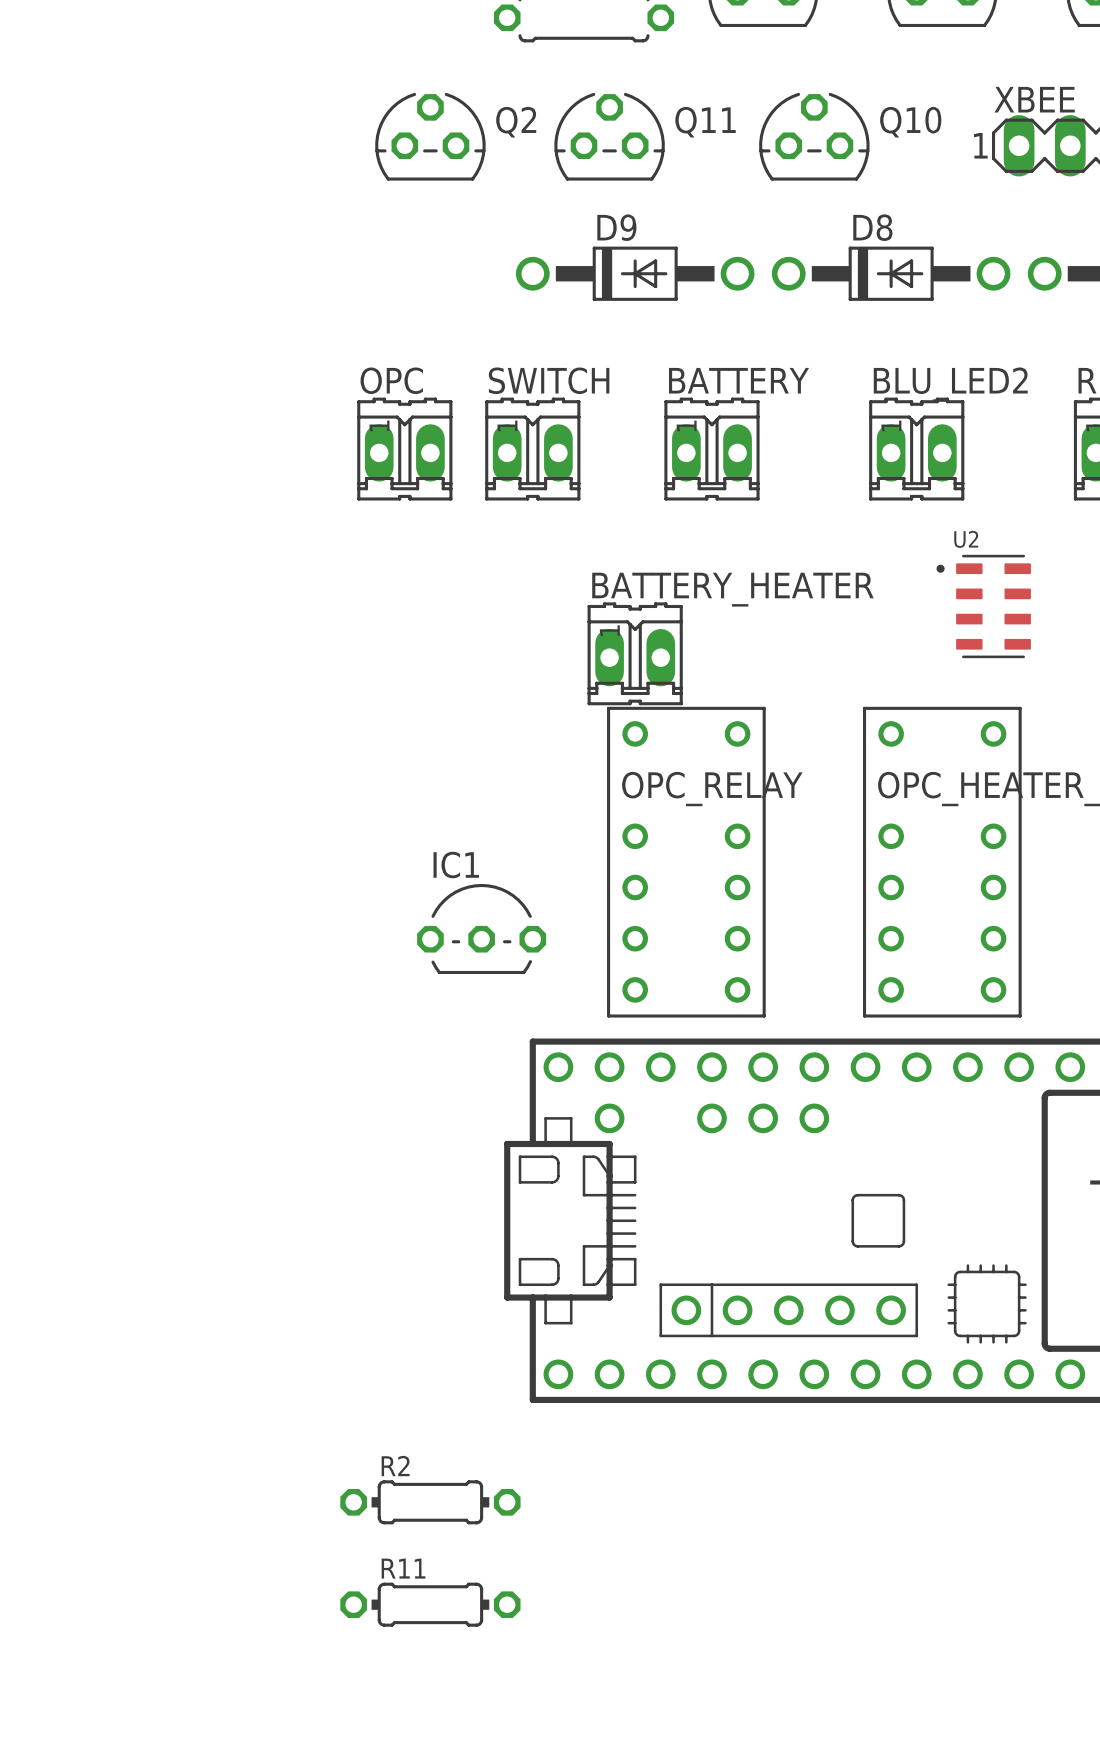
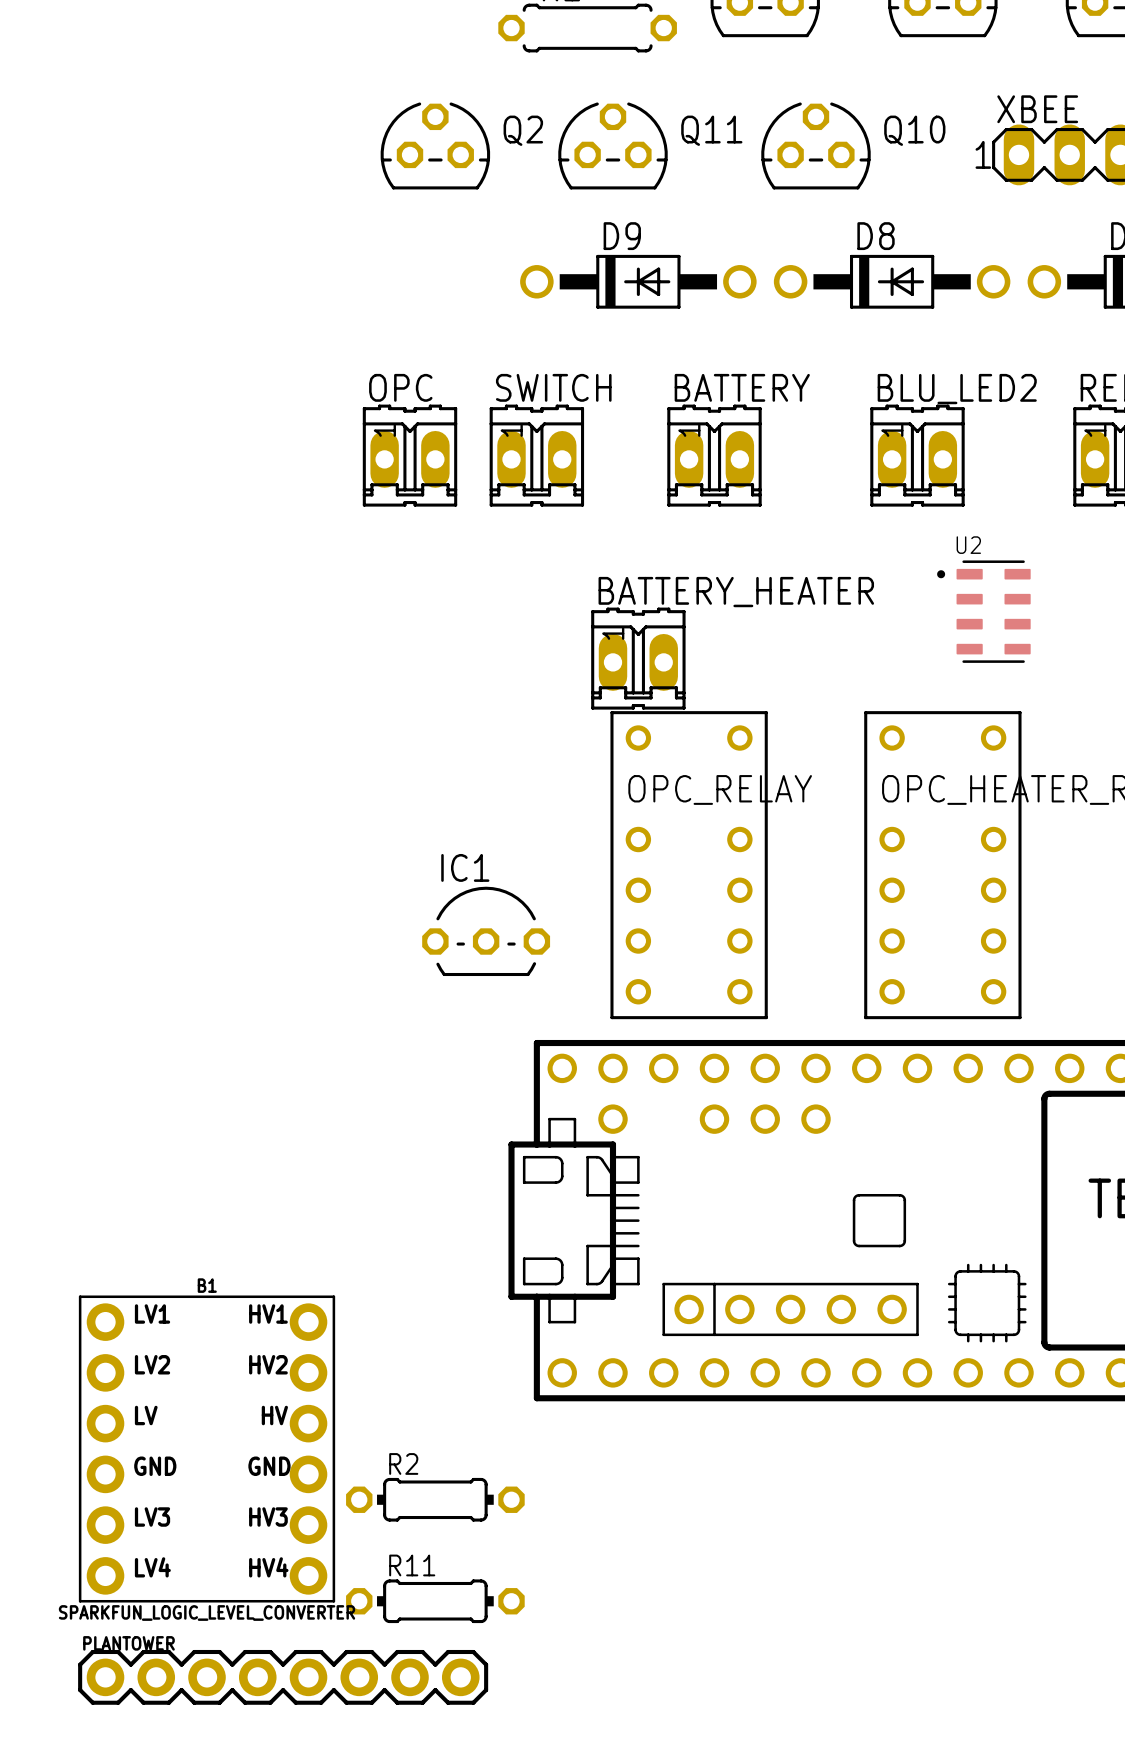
B1: none -> SPARKFUN_LOGIC_LEVEL_CONVERTER (207, 1449)
PLANTOWER: none -> (283, 1677)

